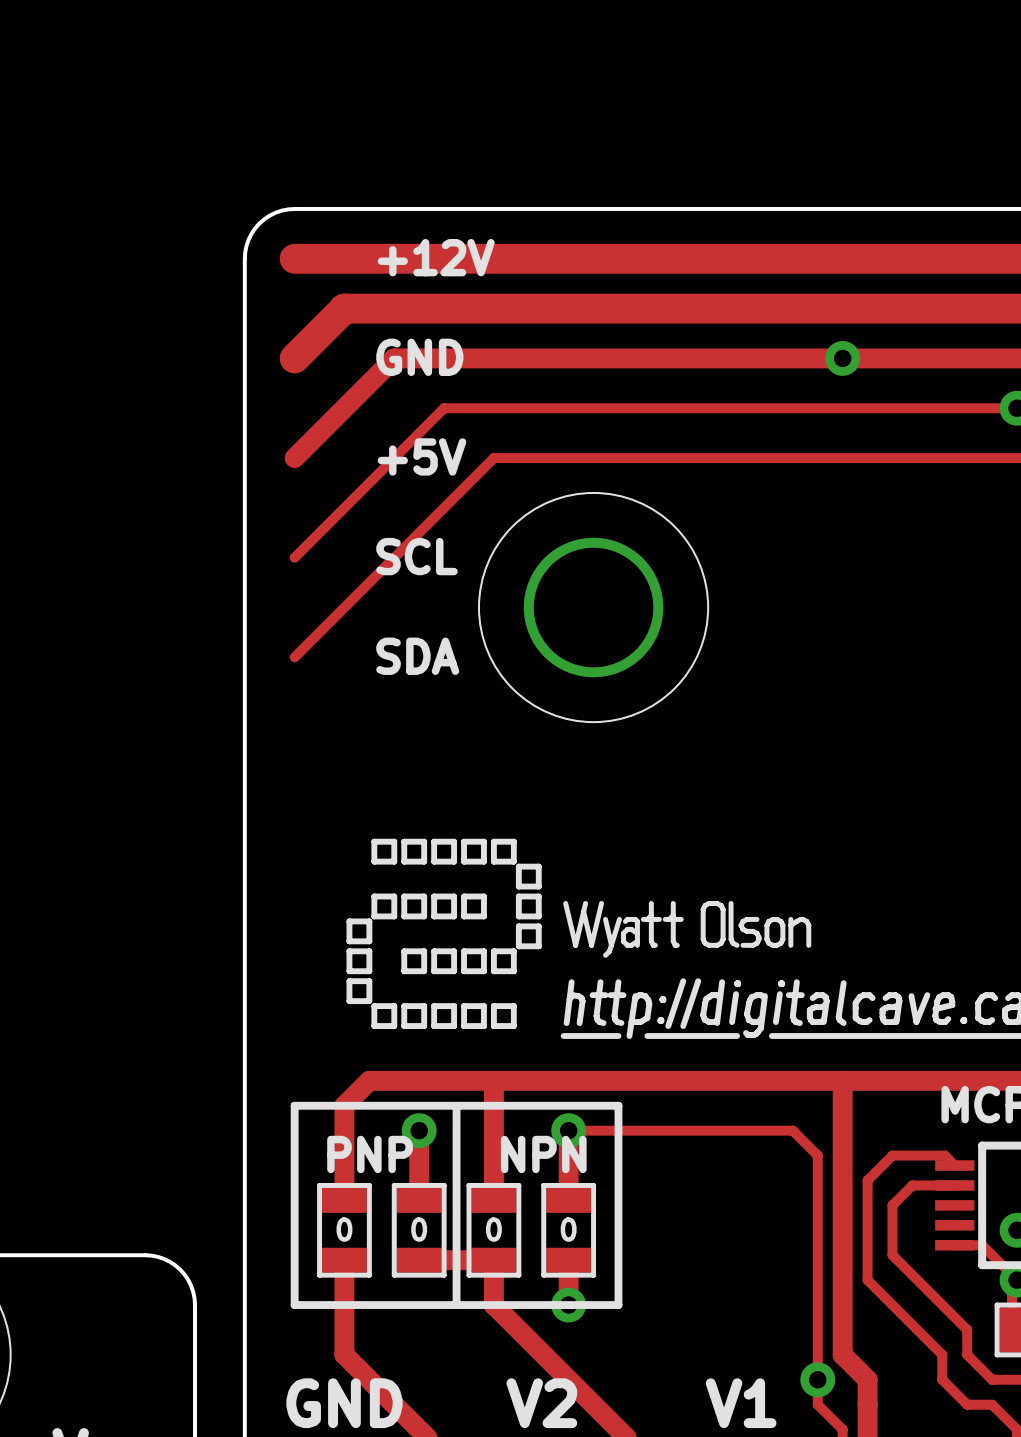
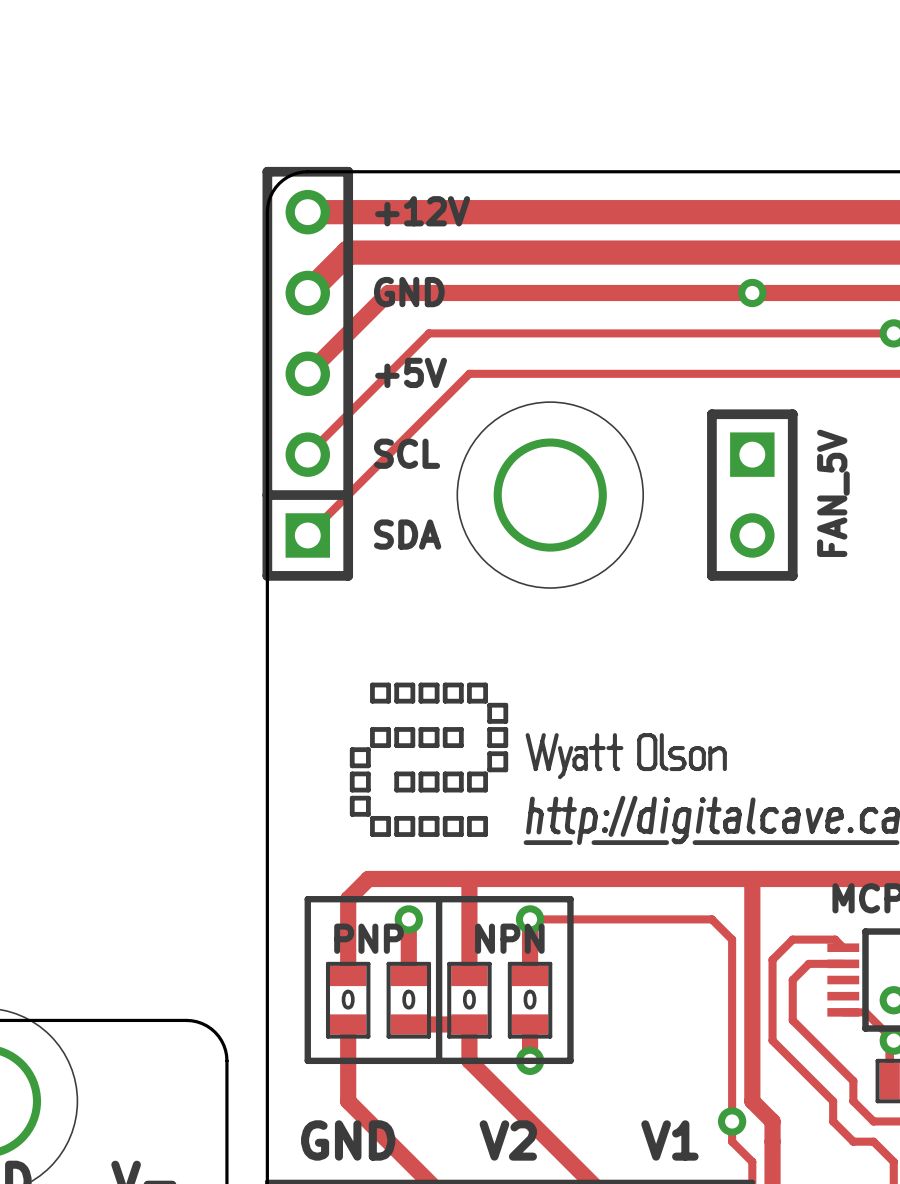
part: none -> (307, 373)
part: none -> FAN_5V (752, 495)

